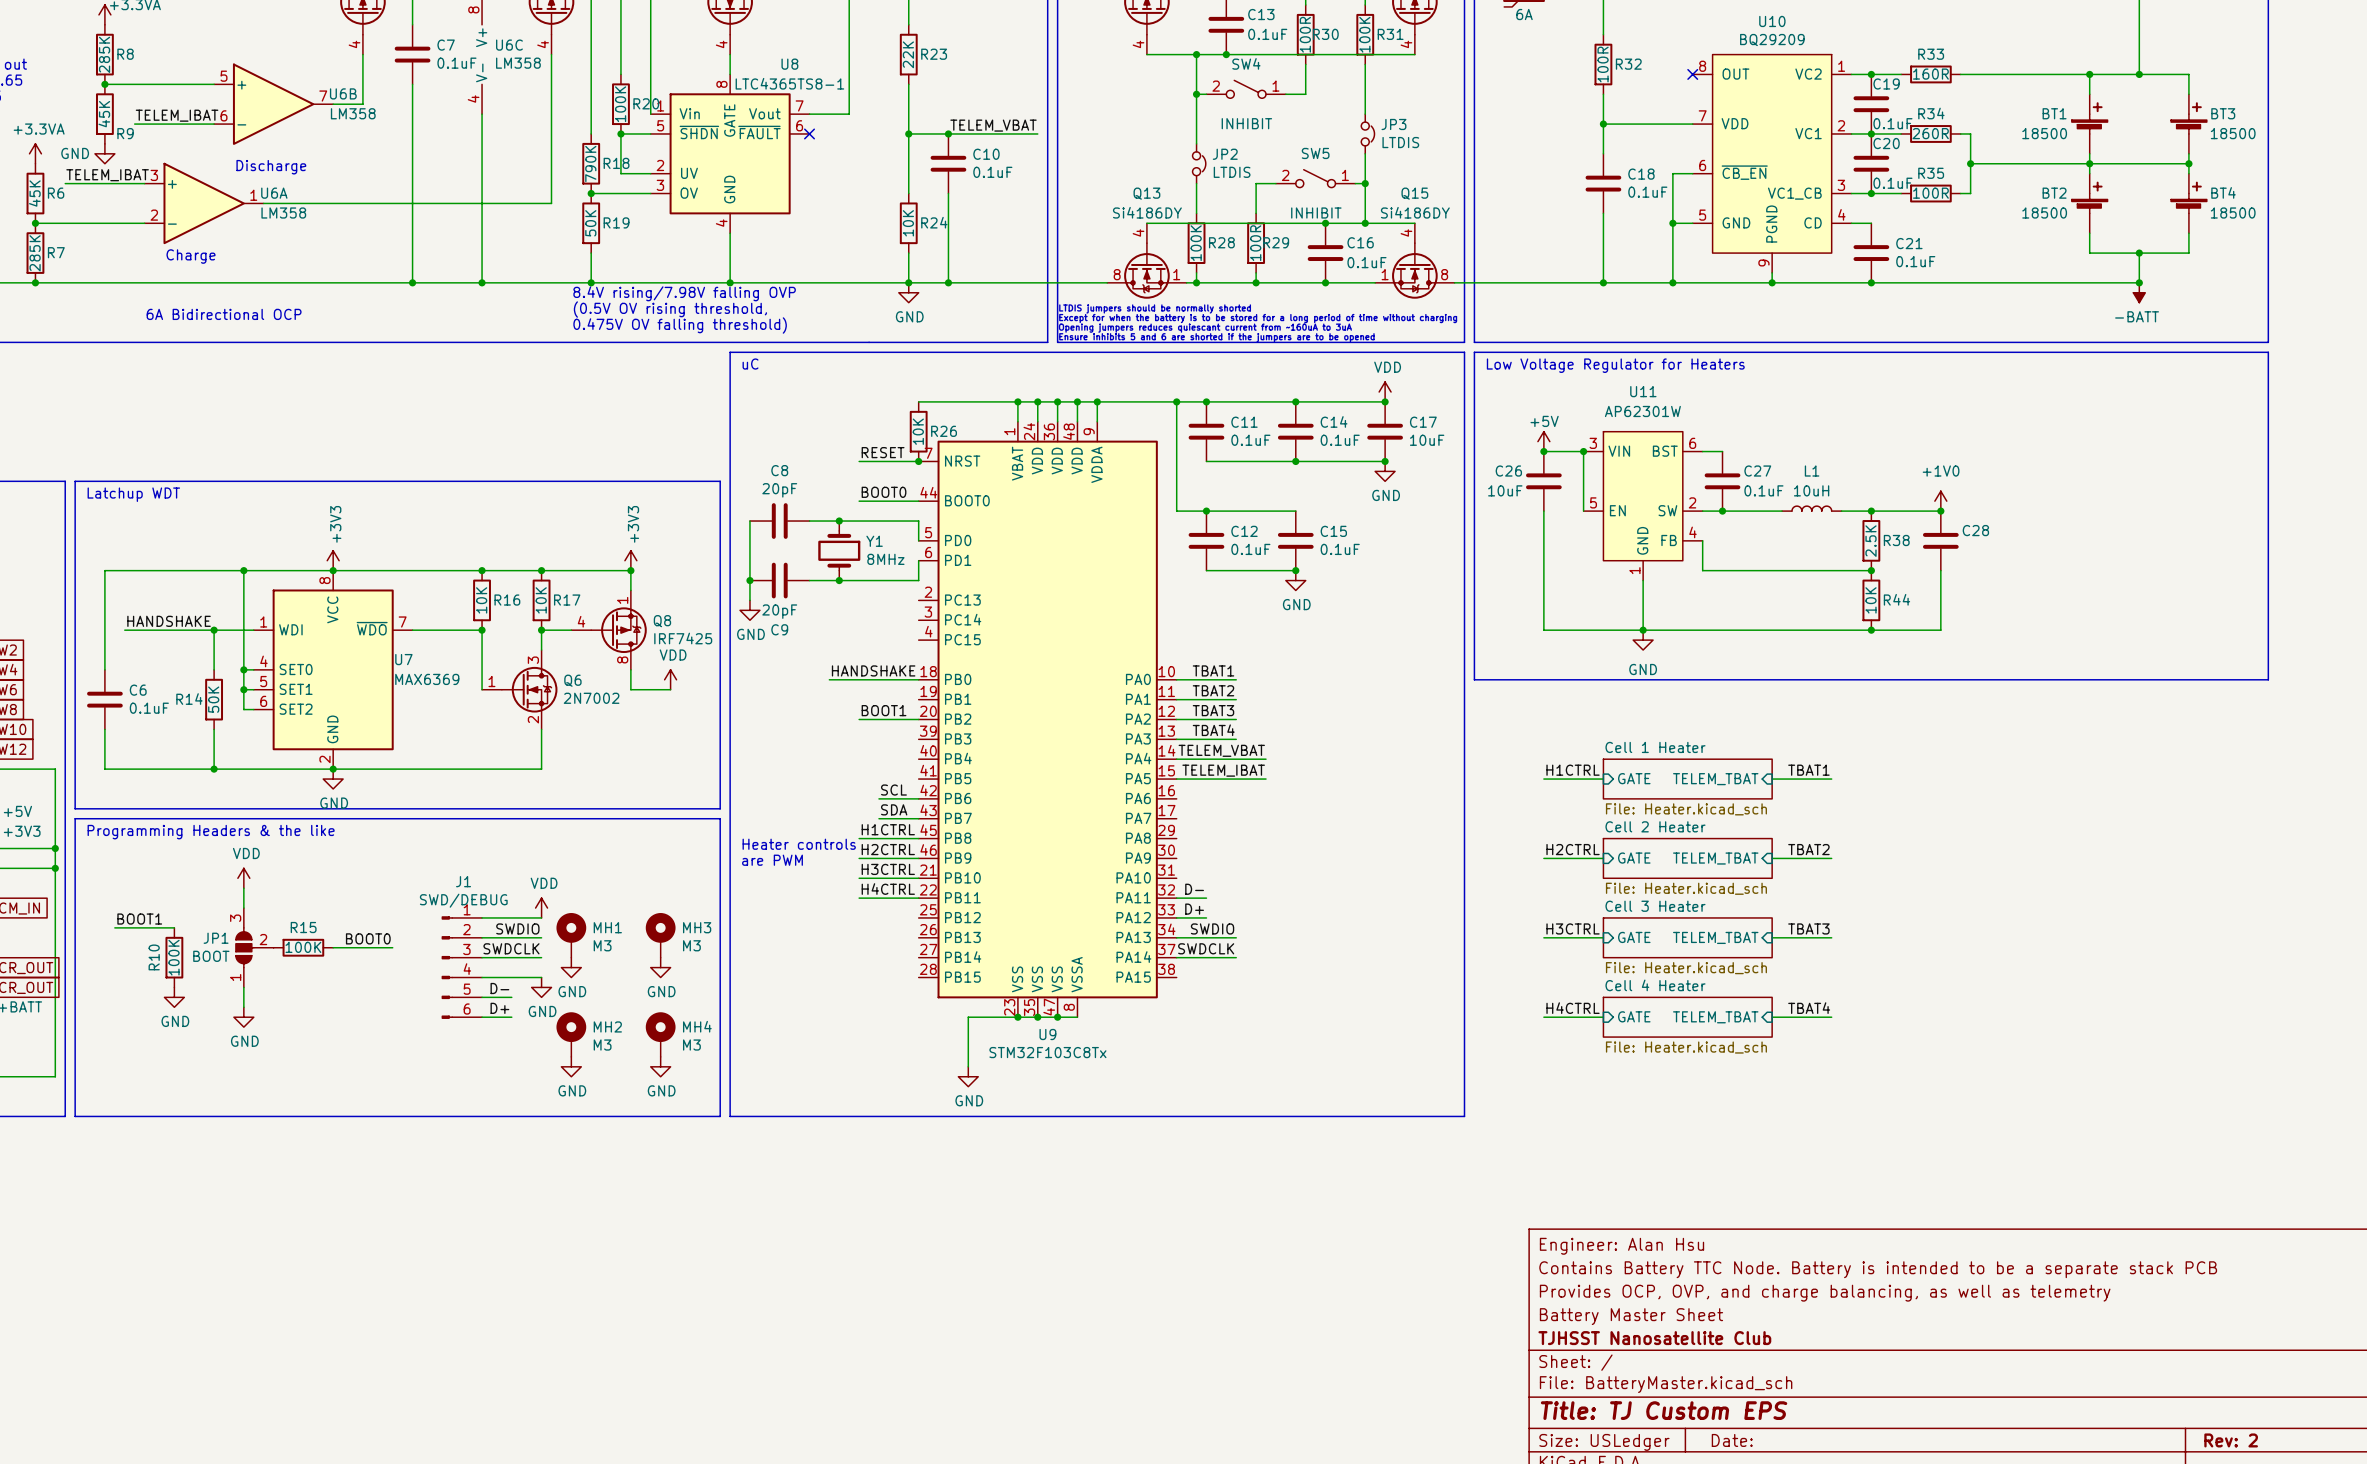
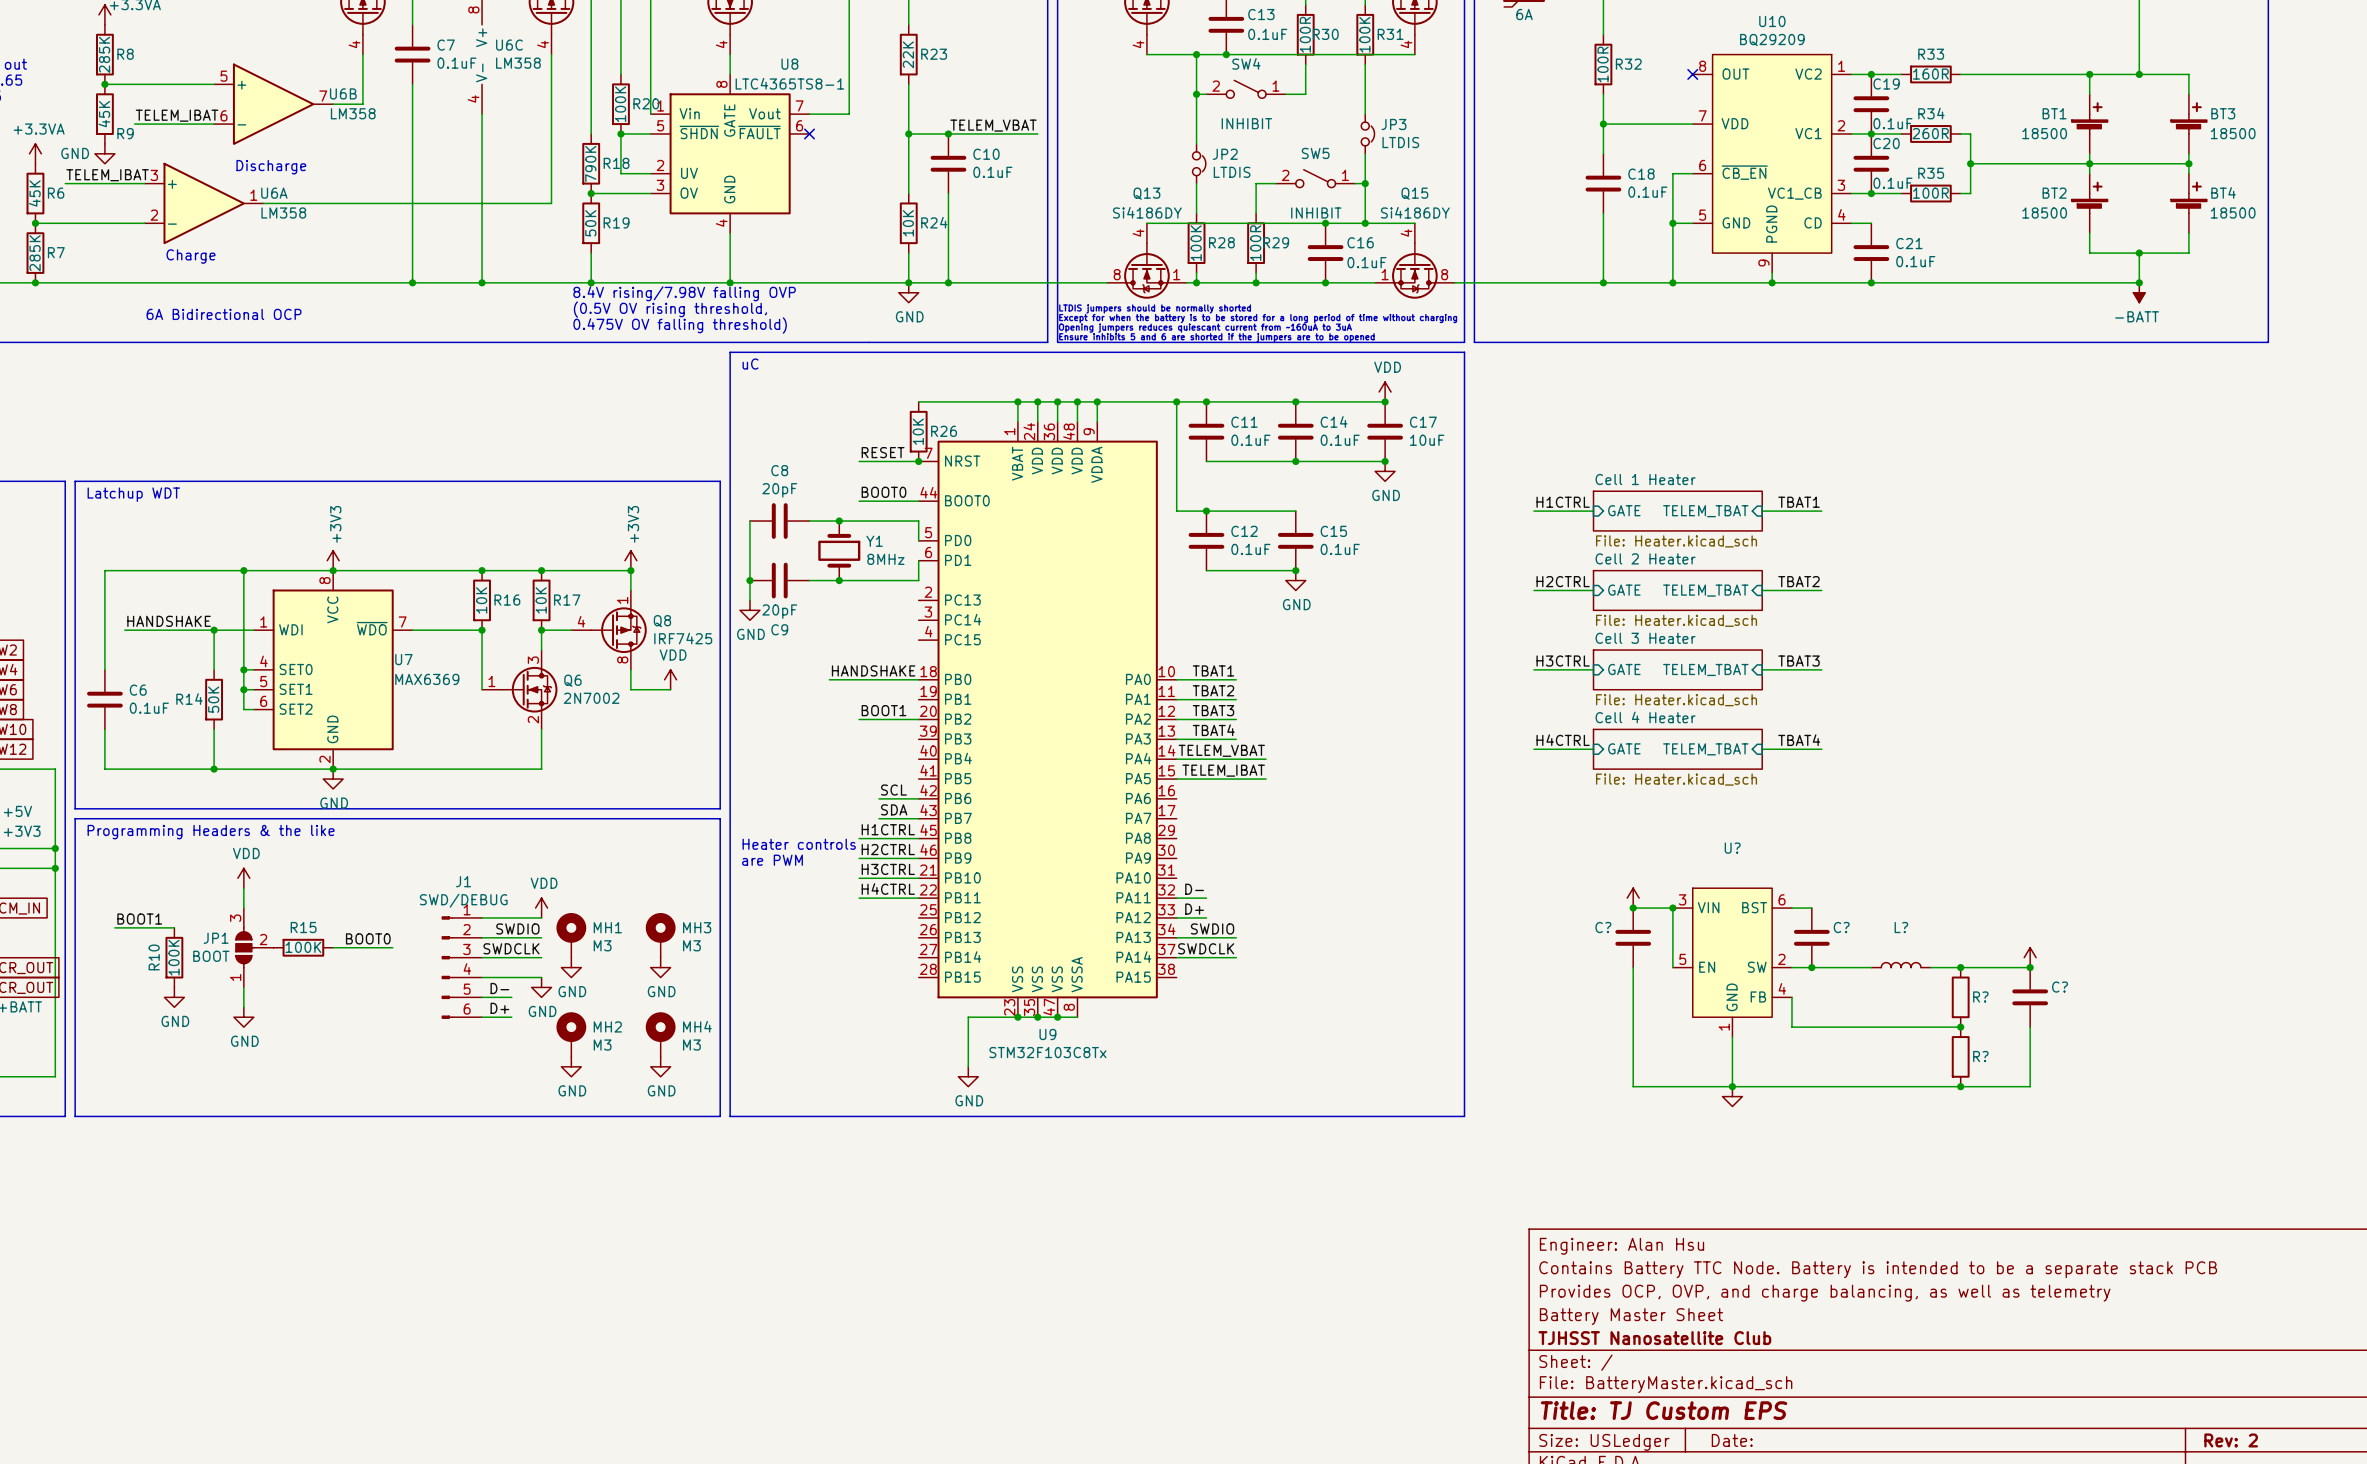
line: (1474, 352) (2268, 352) (2268, 679) (1474, 679) (1474, 352) -> none
text: Low Voltage Regulator for Heaters (1615, 365) -> none
power symbol: +5V (1543, 441) -> none
wire: (1543, 451) (1583, 451) (1583, 511) -> none
junction: (1543, 451) -> none
junction: (1583, 451) -> none
wire: (1702, 451) (1722, 451) -> none
C26: 10uF (1543, 481) -> none
C27: 0.1uF (1722, 481) -> none
power symbol: +1V0 (1940, 501) -> none
label: none -> H1CTRL (1563, 502)
label: none -> TBAT1 (1798, 502)
U11: AP62301W (1643, 506) -> none
L1: 10uH (1811, 508) -> none
sheet pin: none -> GATE (1624, 510)
wire: (1543, 511) (1543, 630) (1940, 630) (1940, 570) -> none
wire: (1702, 511) (1762, 511) -> (1533, 511) (1593, 511)
sheet pin: none -> TELEM_TBAT (1705, 511)
junction: (1722, 511) -> none
wire: none -> (1782, 511) (1821, 511)
wire: (1841, 511) (1940, 511) -> none
junction: (1871, 511) -> none
junction: (1940, 511) -> none
wire: (1702, 540) (1702, 570) (1871, 570) -> none
R38: 2.5K (1871, 540) -> none
C28: (1940, 540) -> none
junction: (1871, 570) -> none
wire: (1643, 580) (1643, 630) -> none
label: none -> H2CTRL (1563, 581)
label: none -> TBAT2 (1798, 581)
sheet pin: none -> GATE (1624, 590)
sheet pin: none -> TELEM_TBAT (1705, 590)
R44: 10K (1871, 600) -> none
junction: (1643, 630) -> none
junction: (1871, 630) -> none
power symbol: GND (1643, 640) -> none
label: none -> H3CTRL (1563, 661)
label: none -> TBAT3 (1798, 661)
sheet pin: none -> GATE (1624, 669)
sheet pin: none -> TELEM_TBAT (1705, 669)
label: none -> H4CTRL (1563, 740)
label: none -> TBAT4 (1799, 740)
label: H1CTRL (1573, 770) -> none
label: TBAT1 (1808, 770) -> none
sheet pin position: GATE (1634, 778) -> GATE (1624, 748)
wire: (1543, 779) (1603, 779) -> (1533, 590) (1593, 590)
sheet Cell 1 Heater position: (1687, 779) -> (1677, 511)
sheet pin position: TELEM_TBAT (1715, 779) -> TELEM_TBAT (1705, 749)
wire: (1772, 779) (1831, 779) -> (1762, 590) (1821, 590)
label: H2CTRL (1573, 849) -> none
label: TBAT2 (1808, 849) -> none
wire: (1543, 858) (1603, 858) -> (1533, 669) (1593, 669)
sheet pin: GATE (1634, 858) -> none
sheet Cell 2 Heater position: (1687, 858) -> (1677, 590)
sheet pin: TELEM_TBAT (1715, 858) -> none
wire: (1772, 858) (1831, 858) -> (1762, 669) (1821, 669)
power symbol: none -> (1633, 898)
wire: none -> (1633, 908) (1672, 908) (1672, 967)
junction: none -> (1633, 908)
junction: none -> (1672, 908)
wire: none -> (1791, 908) (1811, 908)
label: H3CTRL (1573, 928) -> none
label: TBAT3 (1808, 928) -> none
wire: (1543, 937) (1603, 937) -> (1533, 749) (1593, 749)
C?: none -> (1633, 937)
sheet pin: GATE (1634, 937) -> none
sheet Cell 3 Heater position: (1687, 937) -> (1677, 669)
sheet pin: TELEM_TBAT (1715, 937) -> none
wire: (1772, 937) (1831, 937) -> (1762, 749) (1821, 749)
C?: none -> (1811, 937)
power symbol: none -> (2030, 957)
U?: none -> (1732, 962)
L?: none -> (1901, 965)
wire: none -> (1633, 967) (1633, 1086) (2030, 1086) (2030, 1027)
wire: none -> (1791, 967) (1871, 967)
junction: none -> (1811, 967)
wire: none -> (1930, 967) (2030, 967)
junction: none -> (1960, 967)
junction: none -> (2030, 967)
wire: none -> (1791, 997) (1791, 1027) (1960, 1027)
R?: none -> (1960, 997)
C?: none -> (2030, 997)
label: H4CTRL (1573, 1008) -> none
label: TBAT4 (1809, 1008) -> none
sheet pin: GATE (1634, 1016) -> none
wire: (1543, 1017) (1603, 1017) -> none
sheet Cell 4 Heater position: (1687, 1017) -> (1677, 749)
sheet pin: TELEM_TBAT (1715, 1017) -> none
wire: (1772, 1017) (1831, 1017) -> none
junction: none -> (1960, 1027)
wire: none -> (1732, 1037) (1732, 1086)
R?: none -> (1960, 1056)
junction: none -> (1732, 1086)
junction: none -> (1960, 1086)
power symbol: none -> (1732, 1096)

